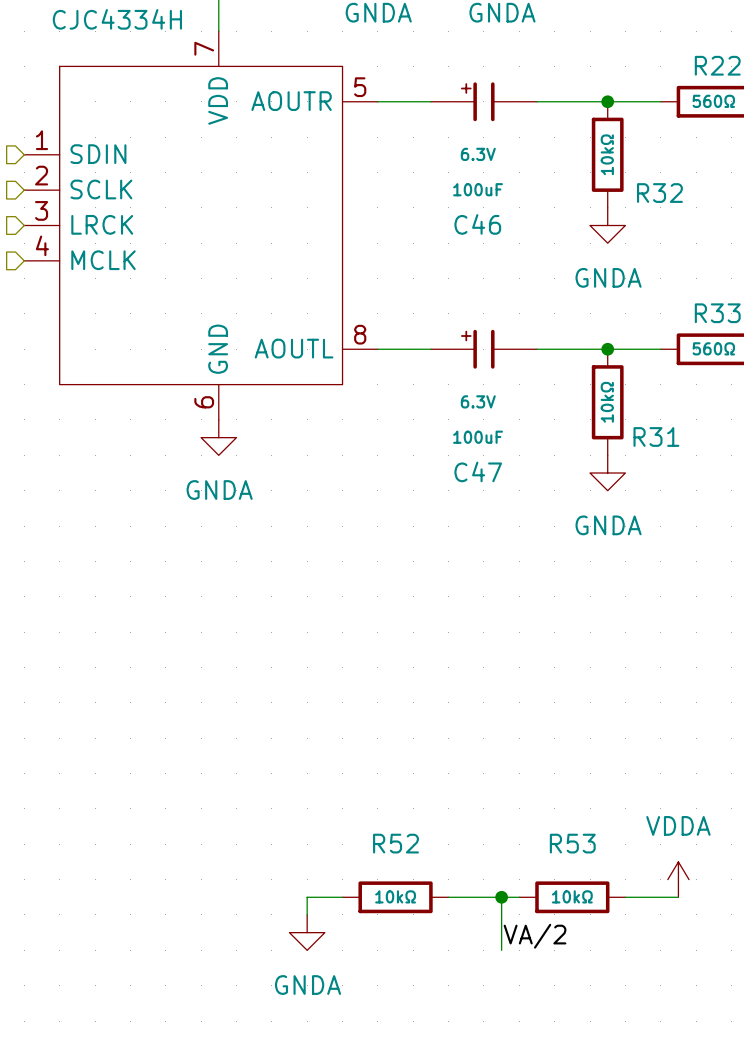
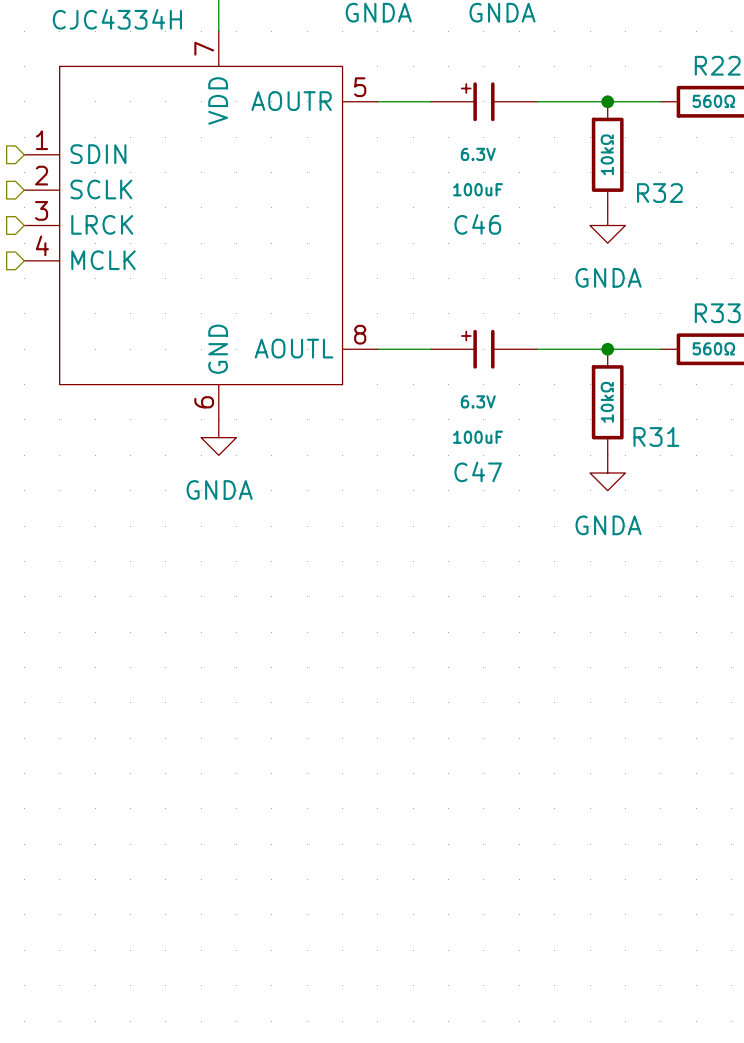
power symbol: VDDA (678, 879) -> none
wire: (342, 897) (307, 897) (307, 914) -> none
R52: 10kΩ (395, 897) -> none
wire: (448, 897) (519, 897) -> none
wire: (501, 897) (501, 950) -> none
junction: (501, 897) -> none
R53: 10kΩ (572, 897) -> none
wire: (625, 897) (678, 897) -> none
power symbol: GNDA (307, 932) -> none
label: VA/2 (535, 936) -> none

